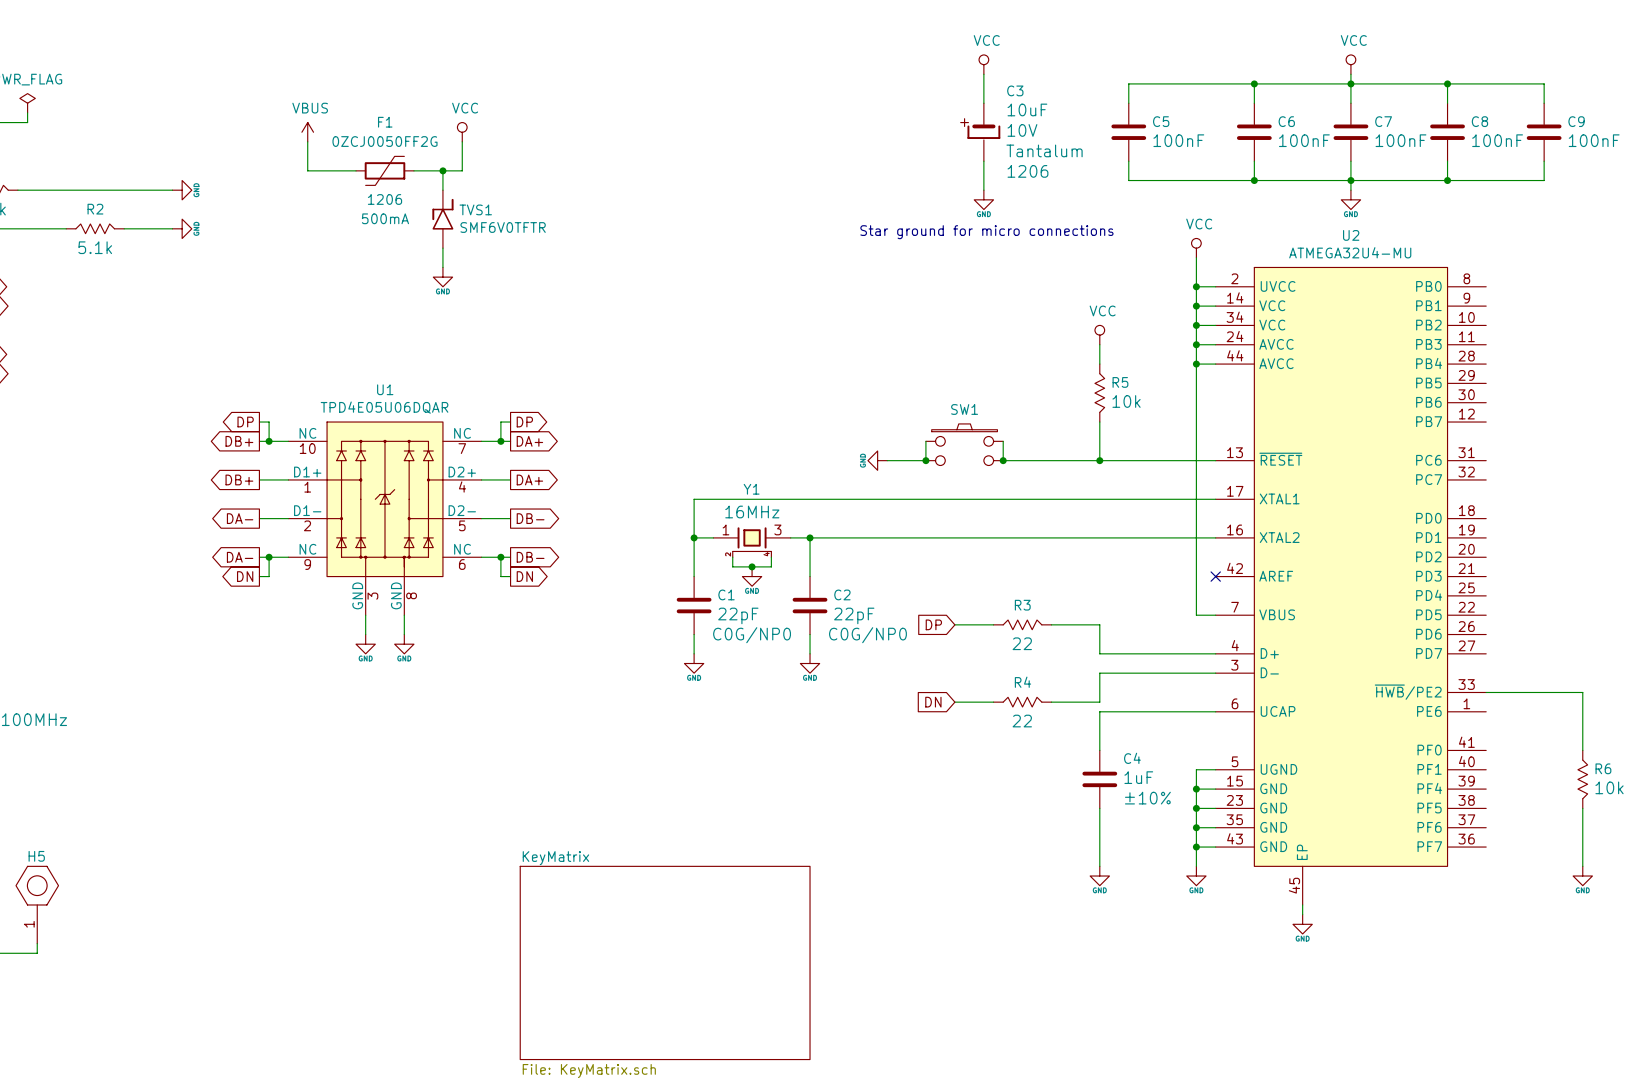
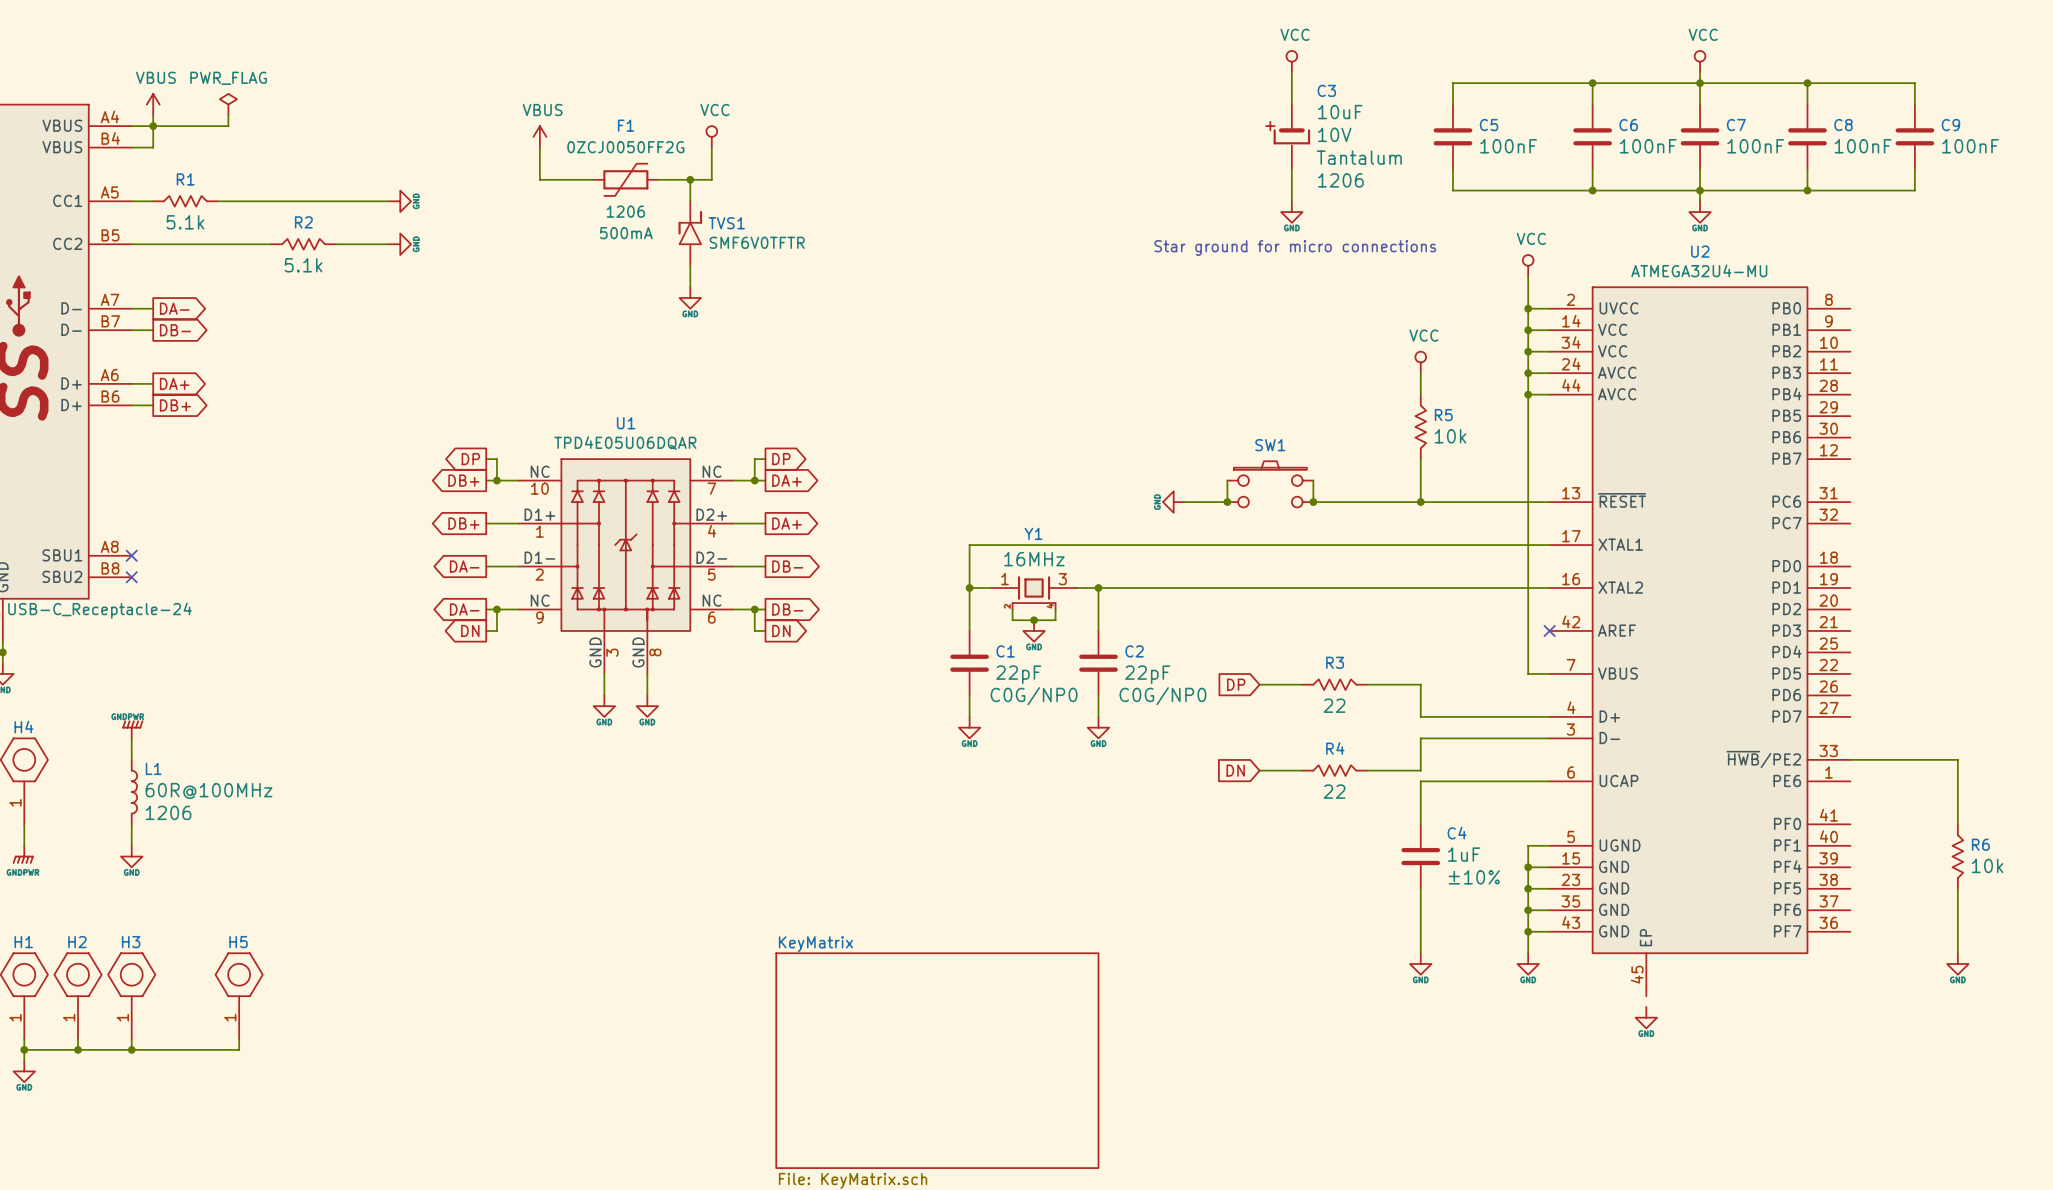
wire: (1302, 904) (1302, 914) -> none

